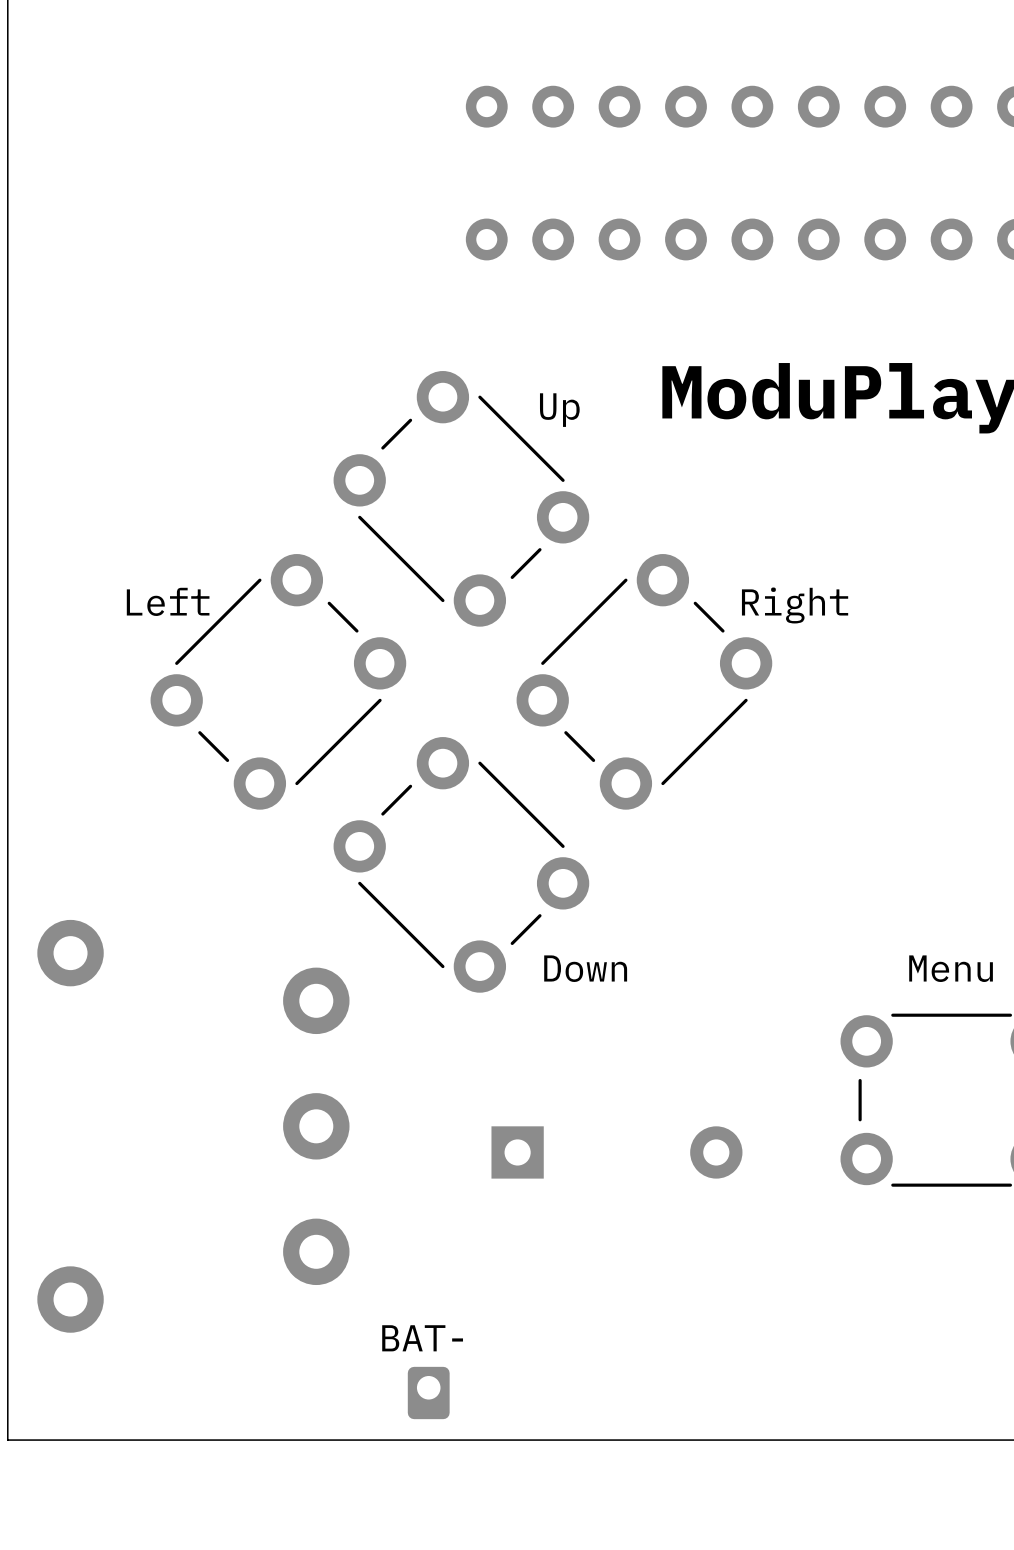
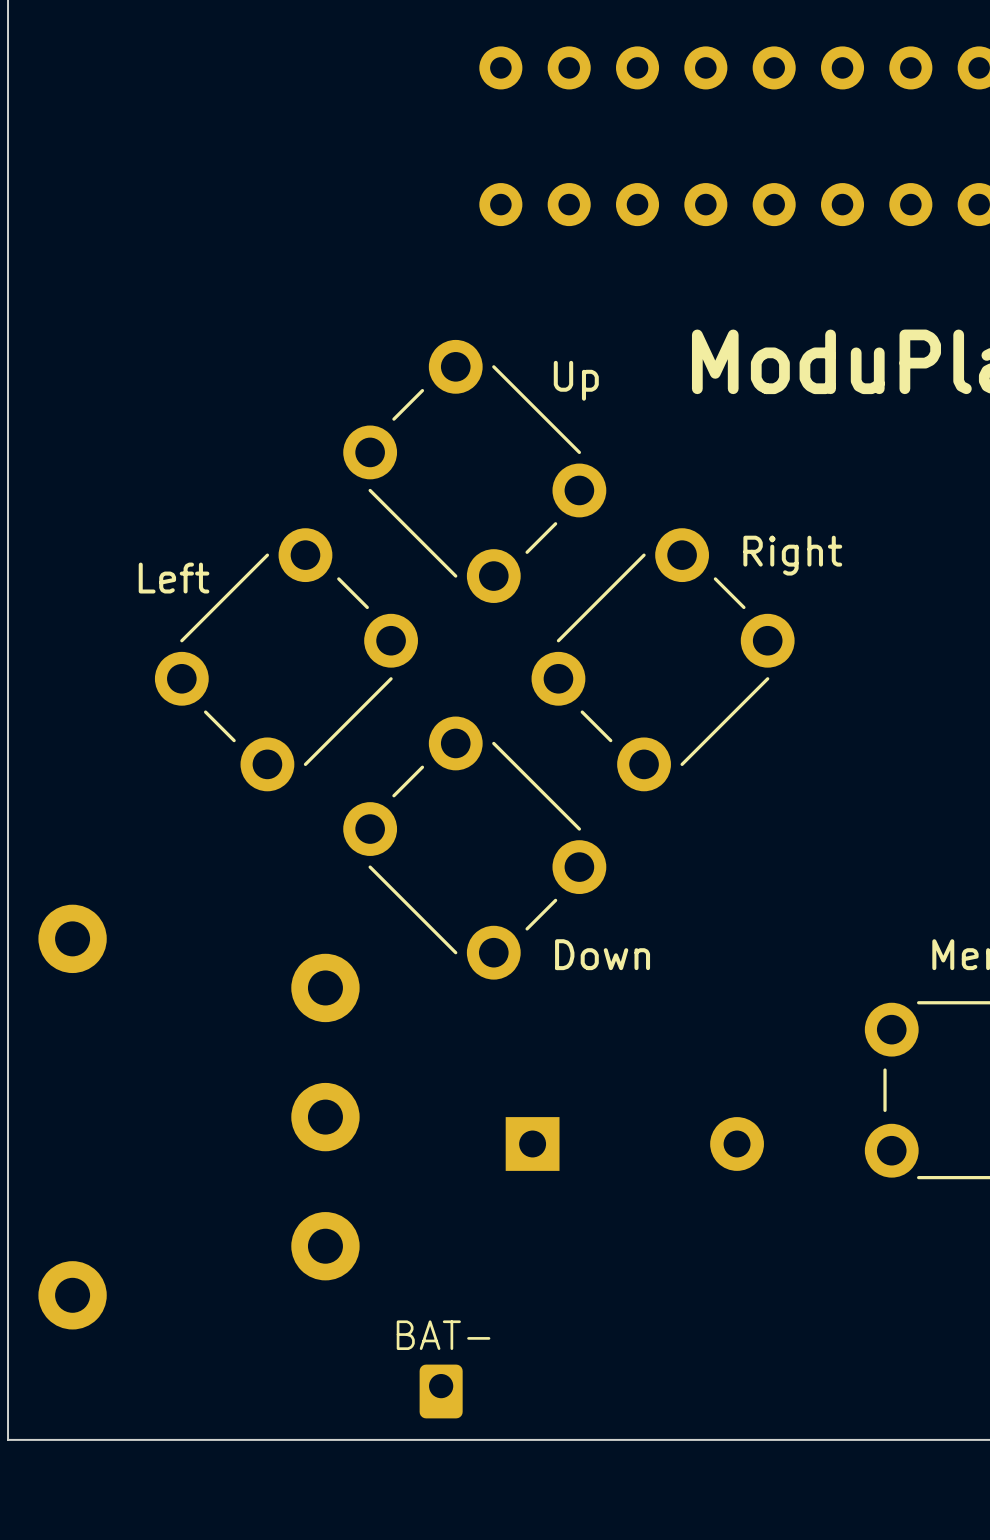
part value position: Right (795, 605) -> Right (792, 555)

